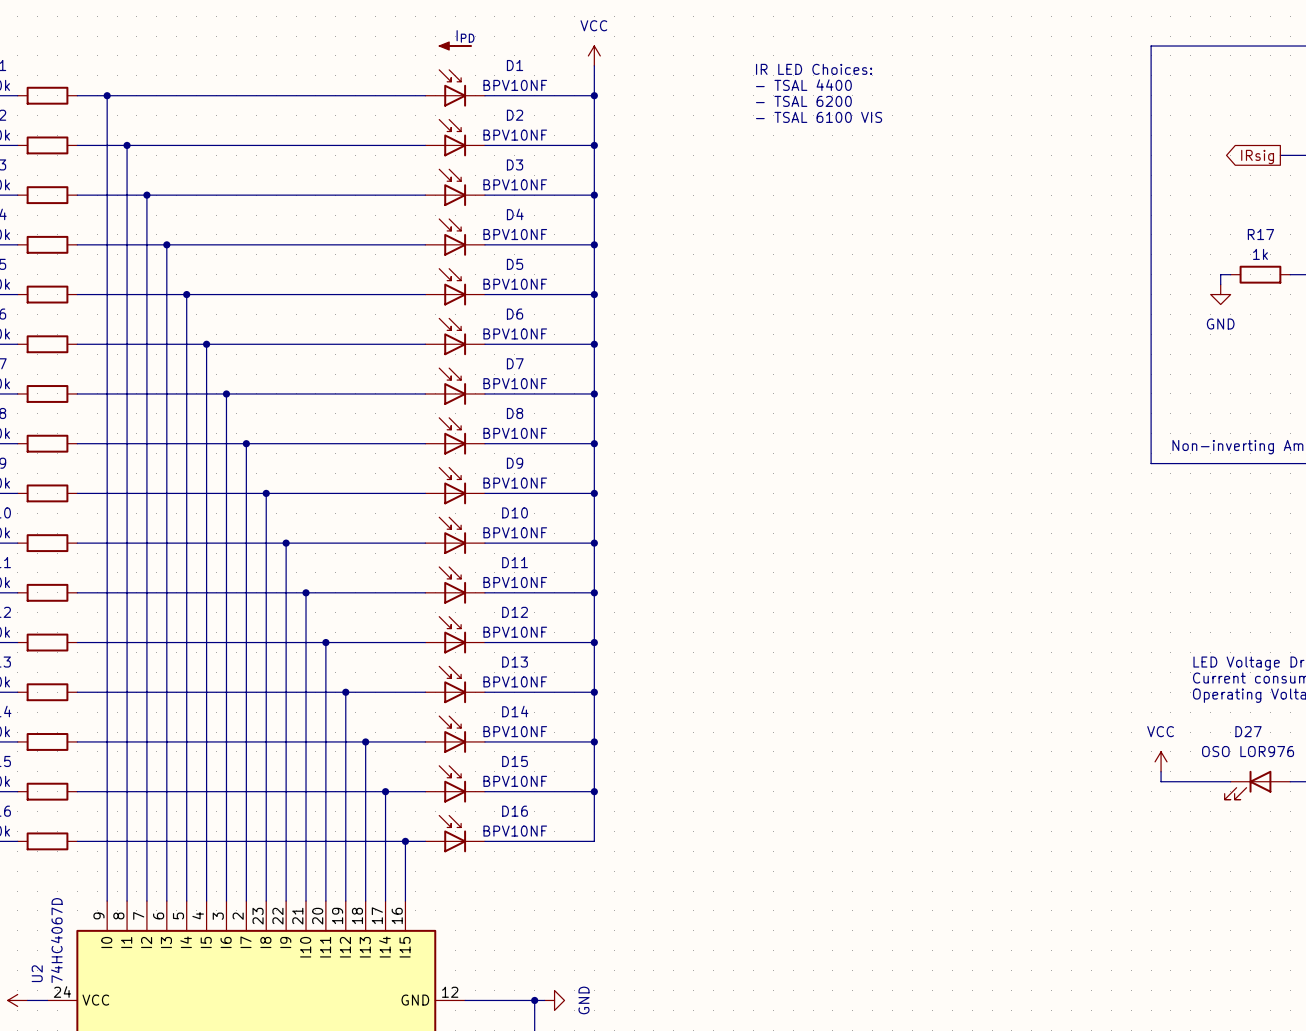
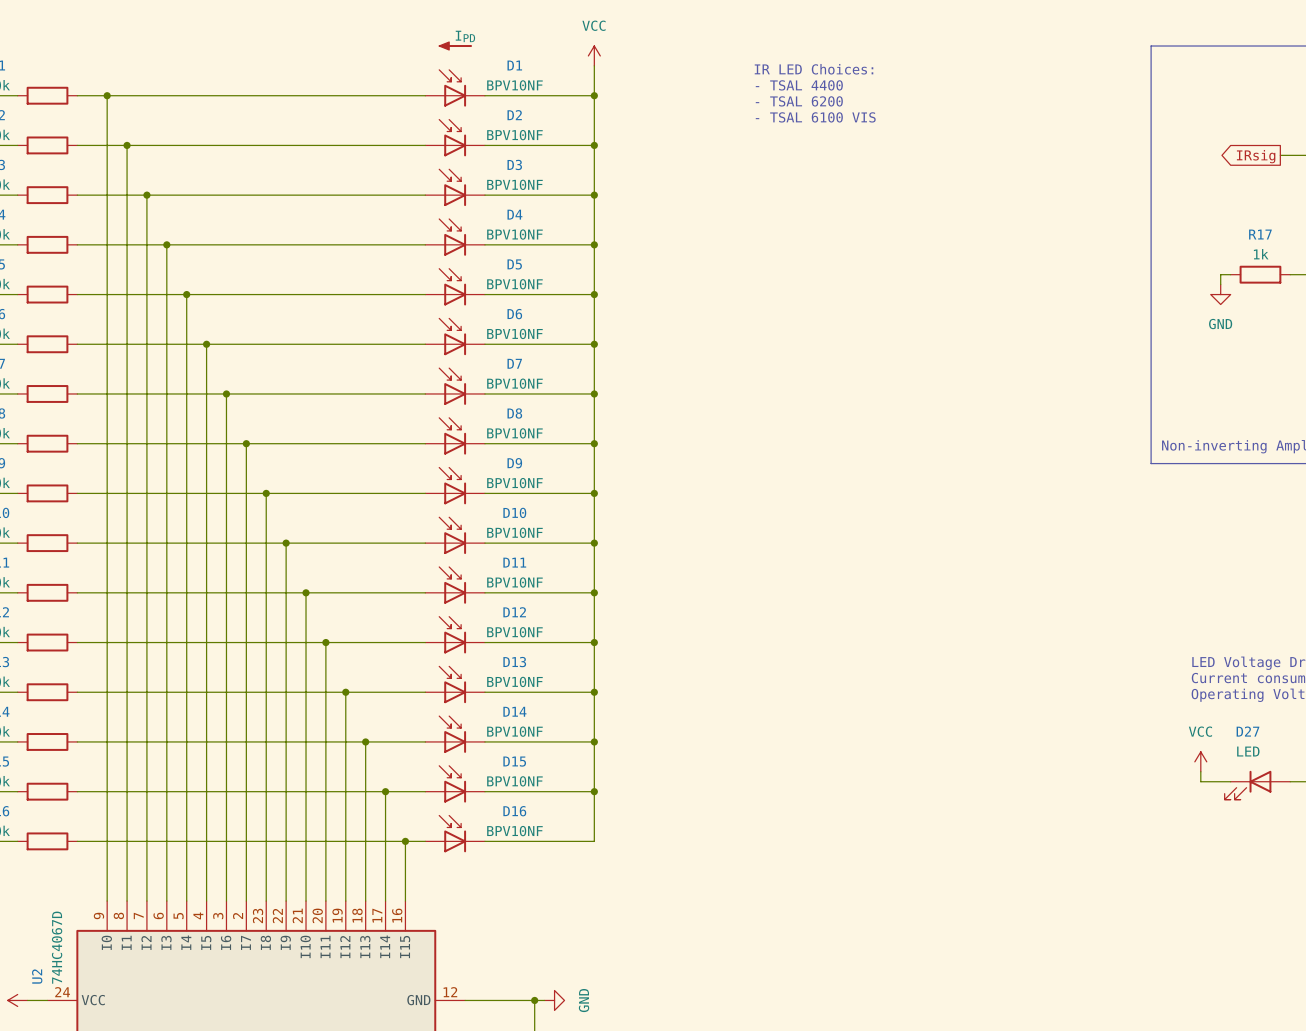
D27 value: OSO LOR976 (1248, 751) -> LED (1248, 751)
power symbol position: VCC (1161, 761) -> VCC (1200, 761)
wire: (1161, 771) (1161, 781) (1200, 781) -> (1200, 771) (1200, 781)

